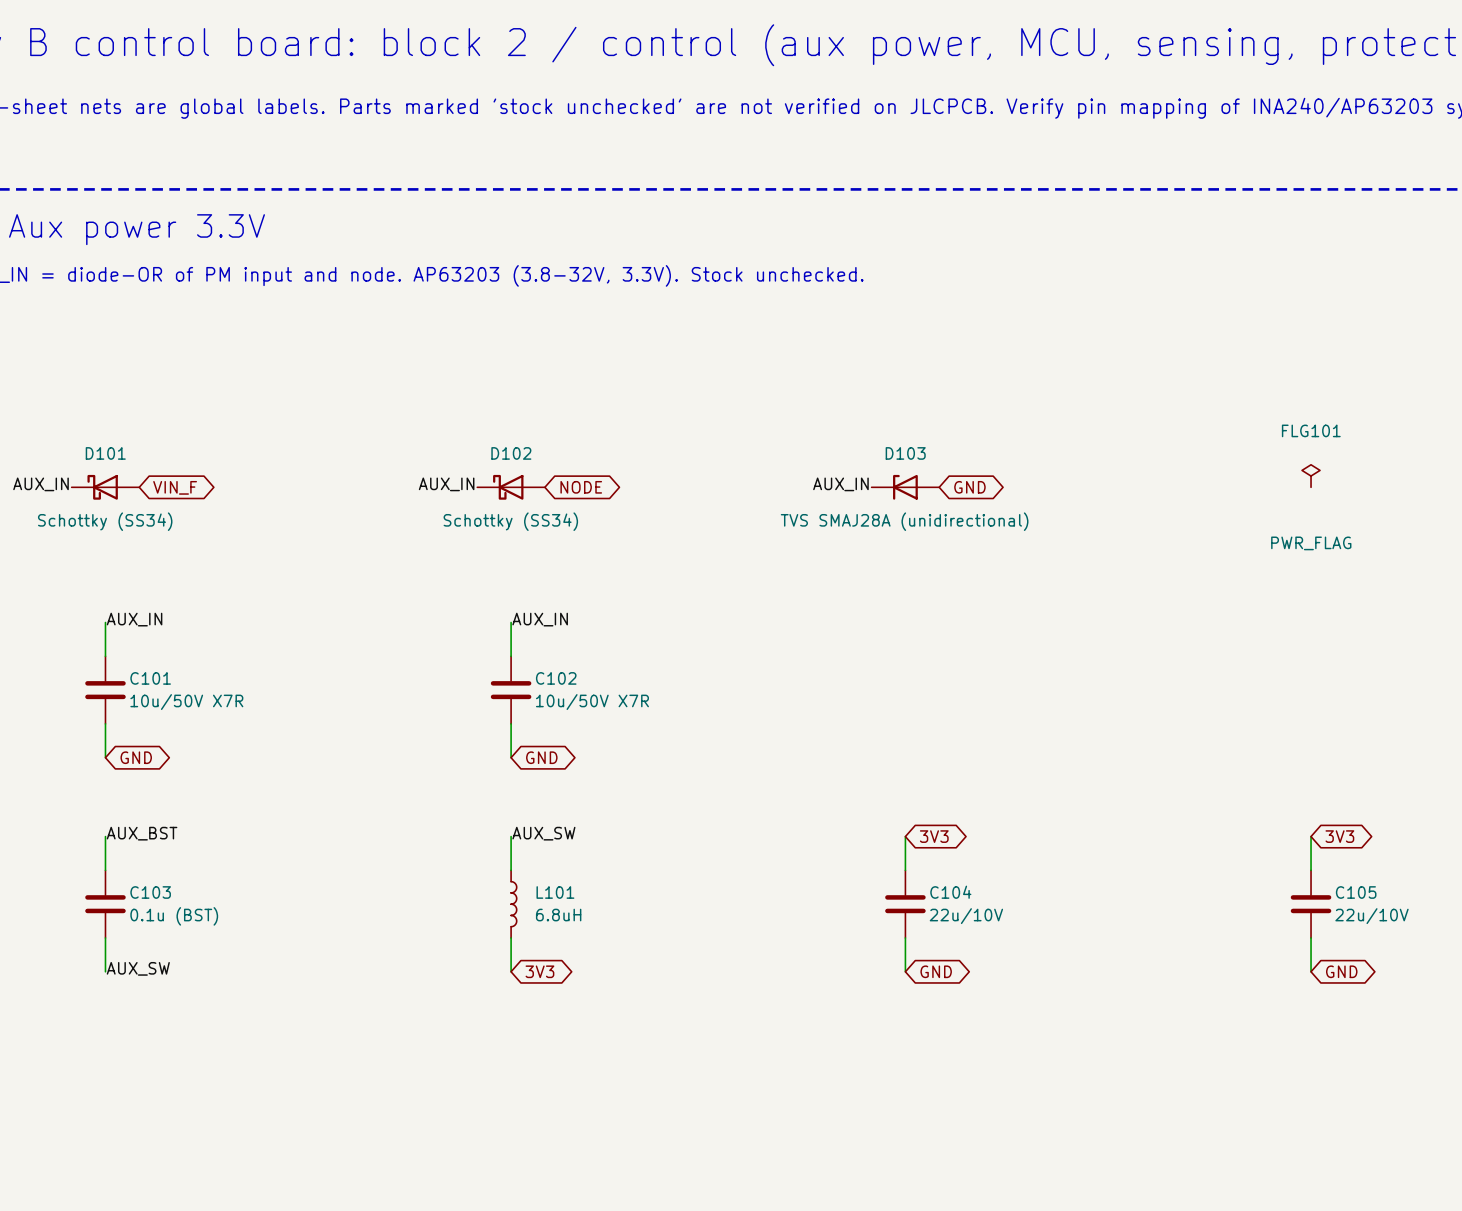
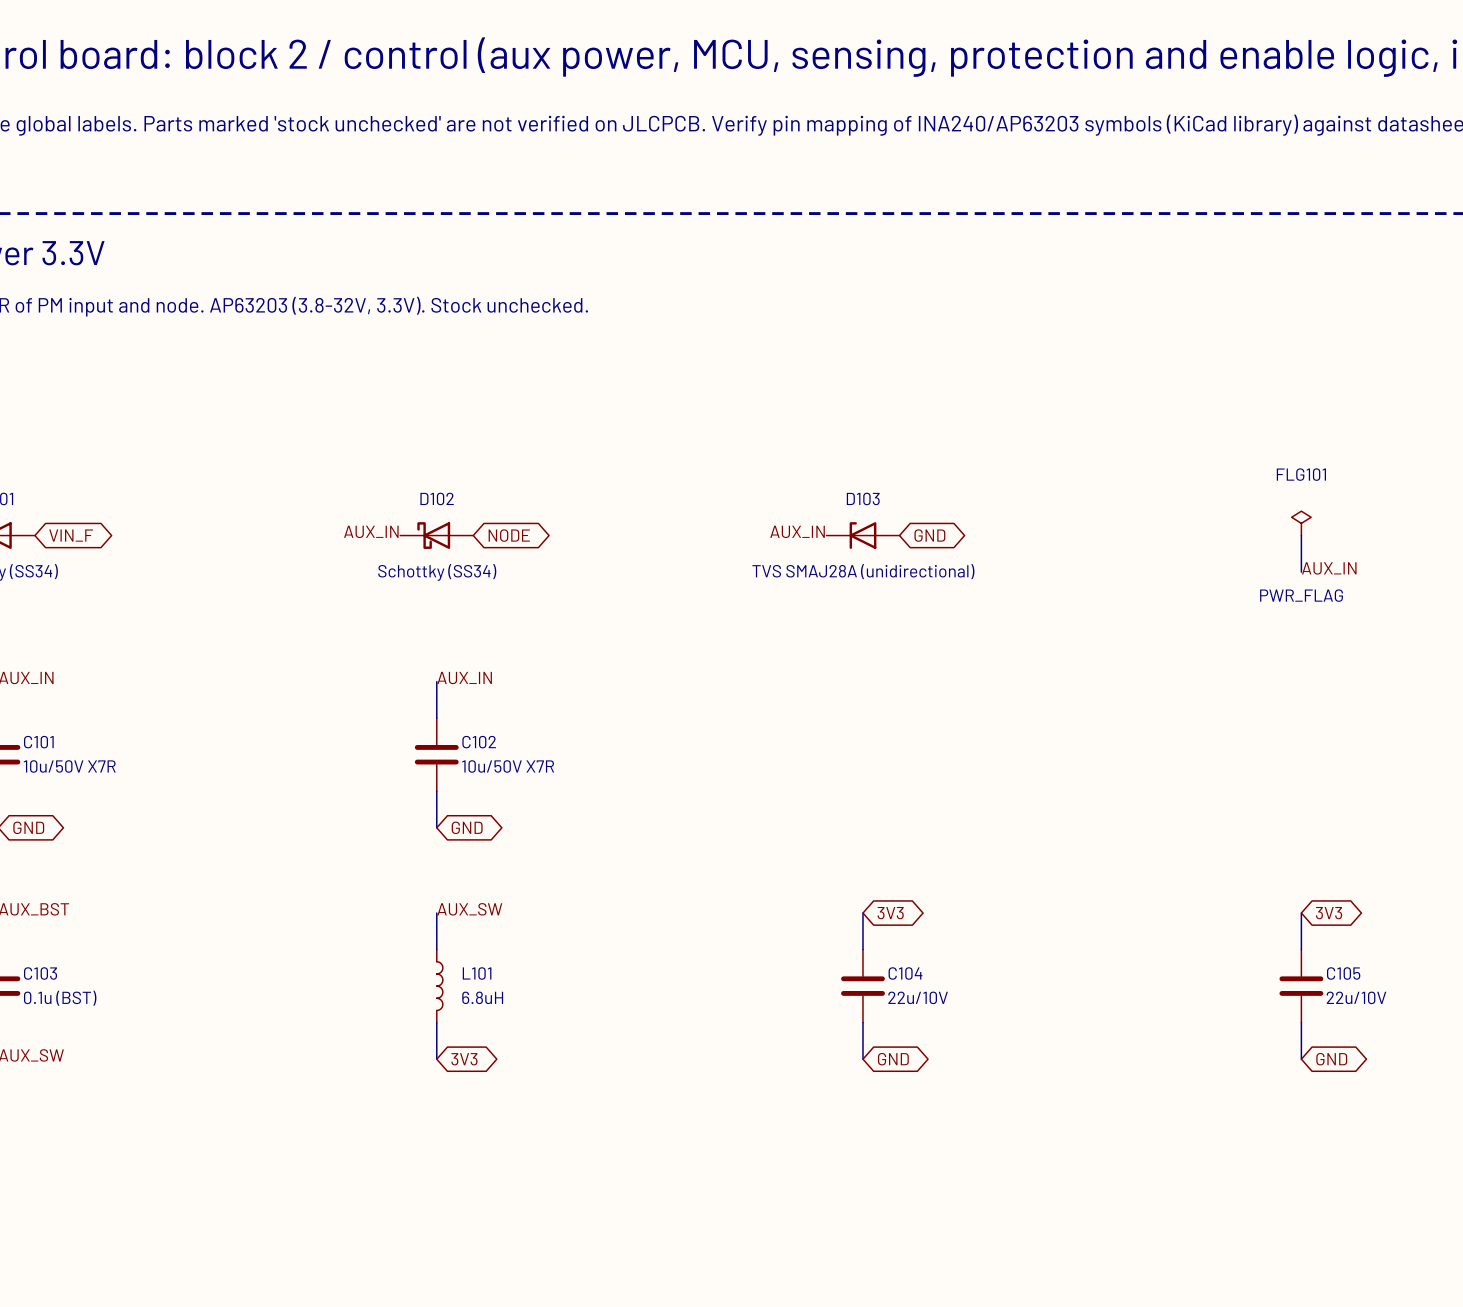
wire: none -> (1301, 535) (1301, 572)
label: none -> AUX_IN (1329, 568)

